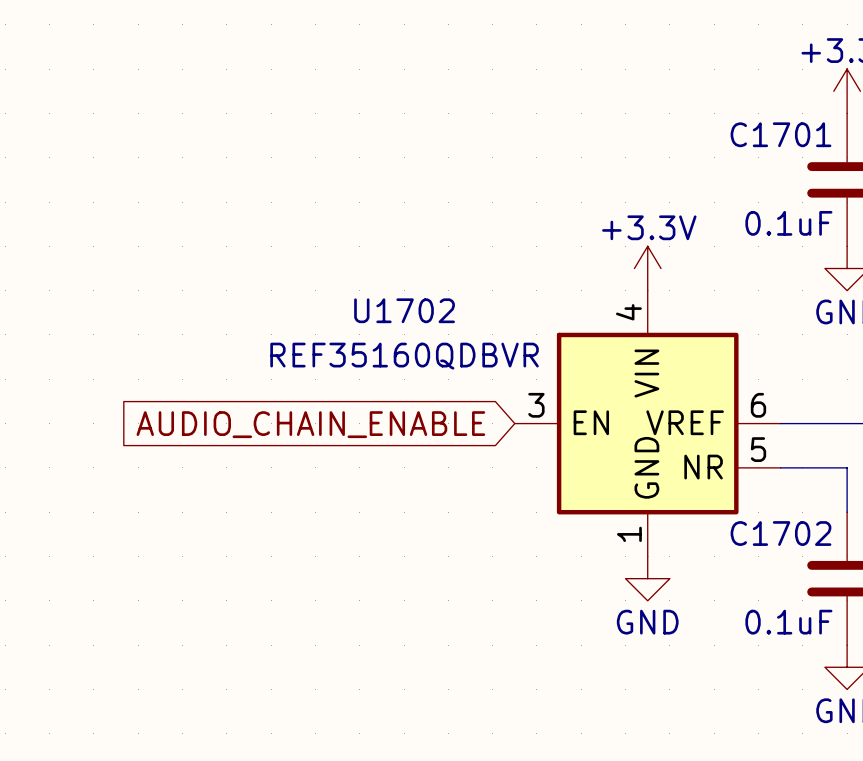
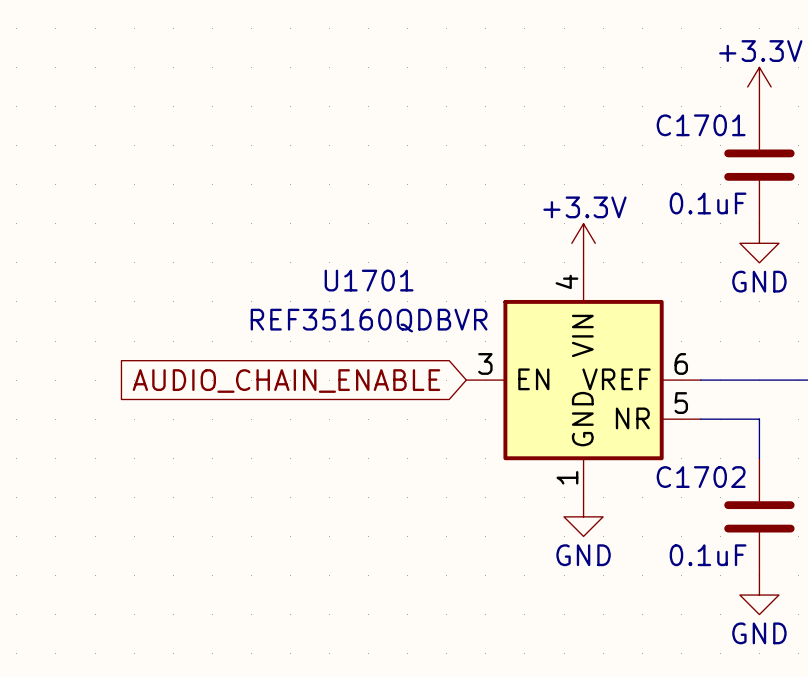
U1702 name: U1702 (404, 310) -> U1701 (369, 280)

